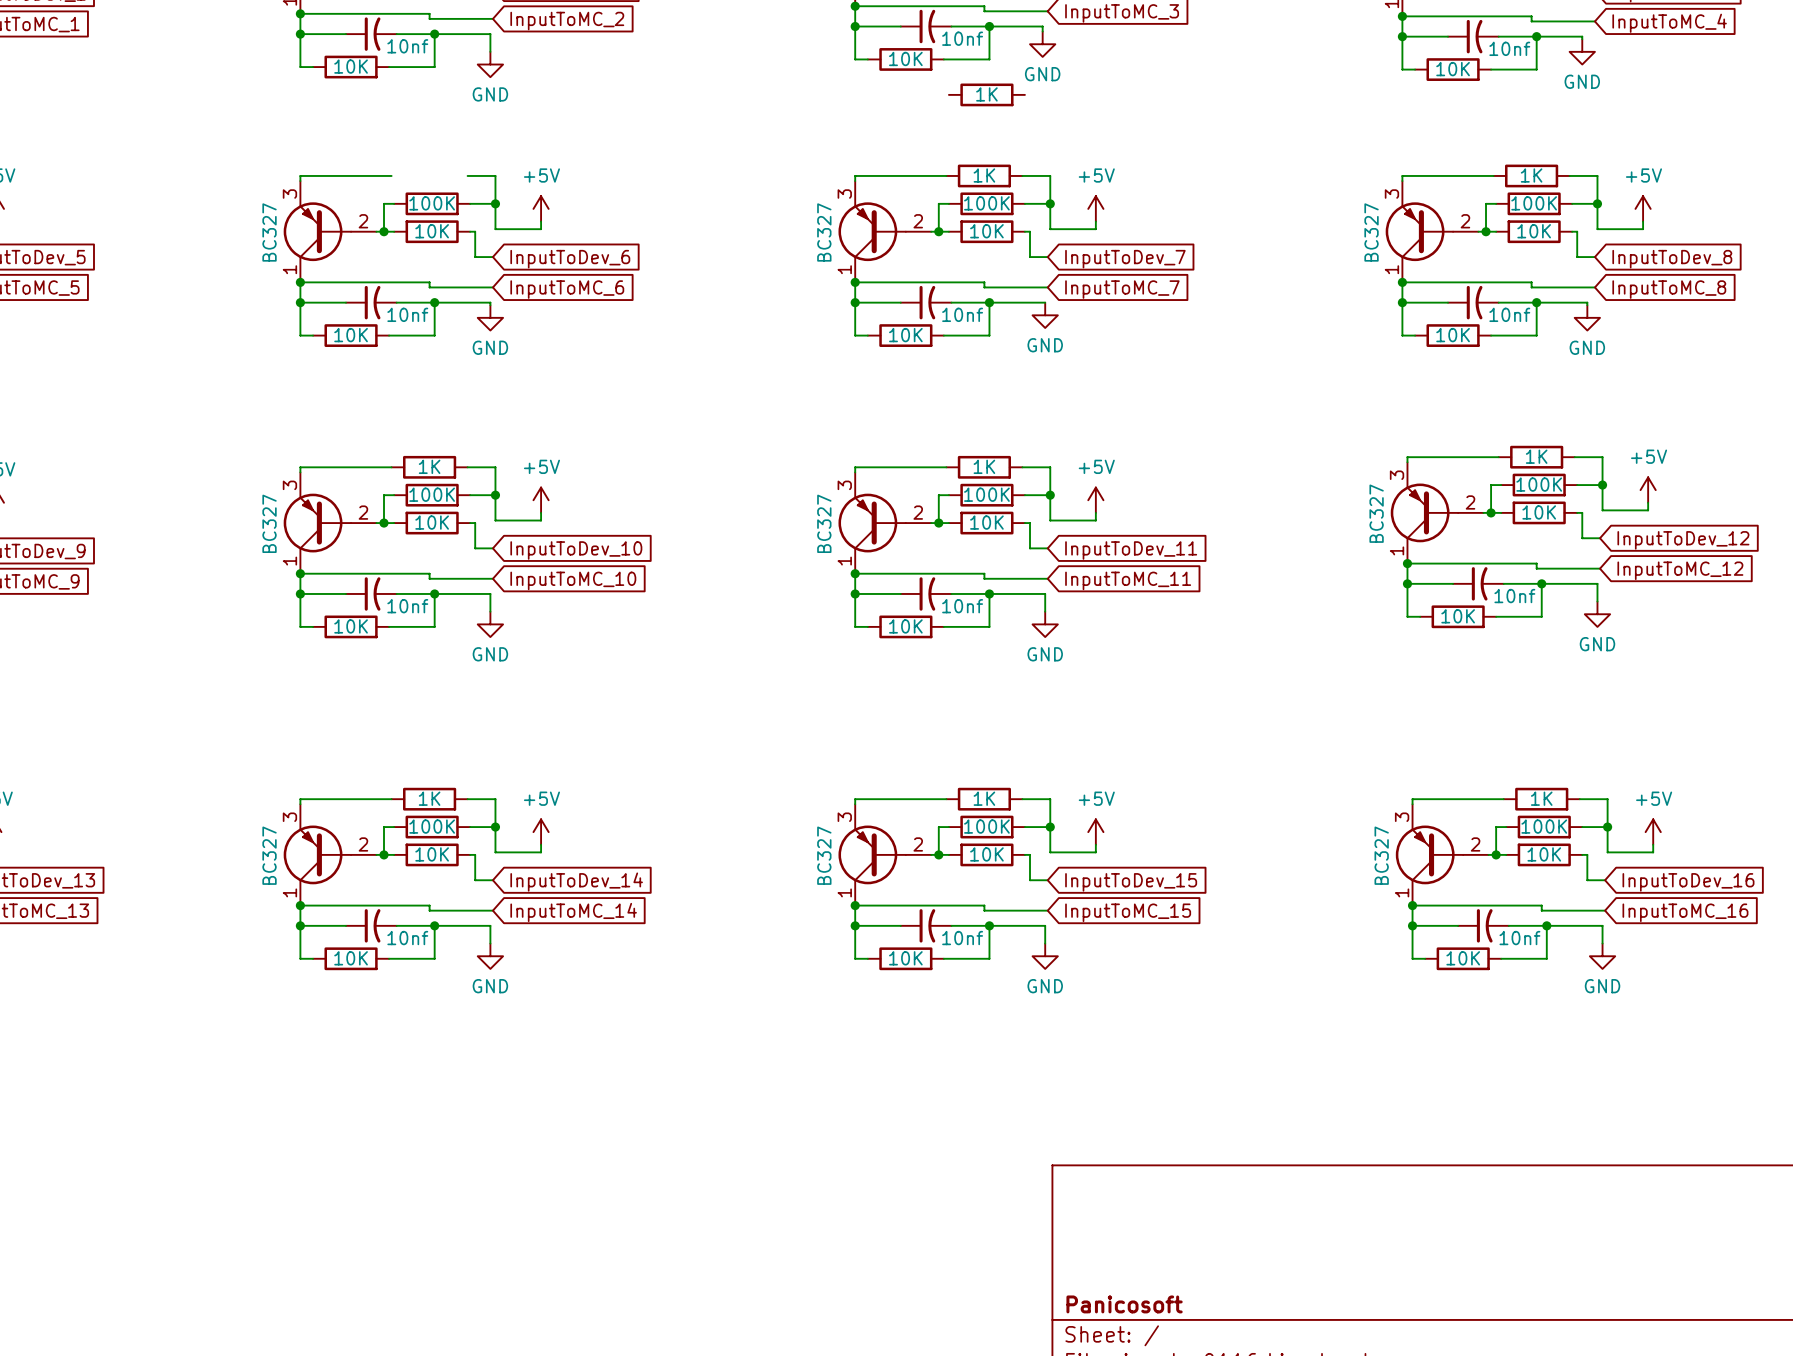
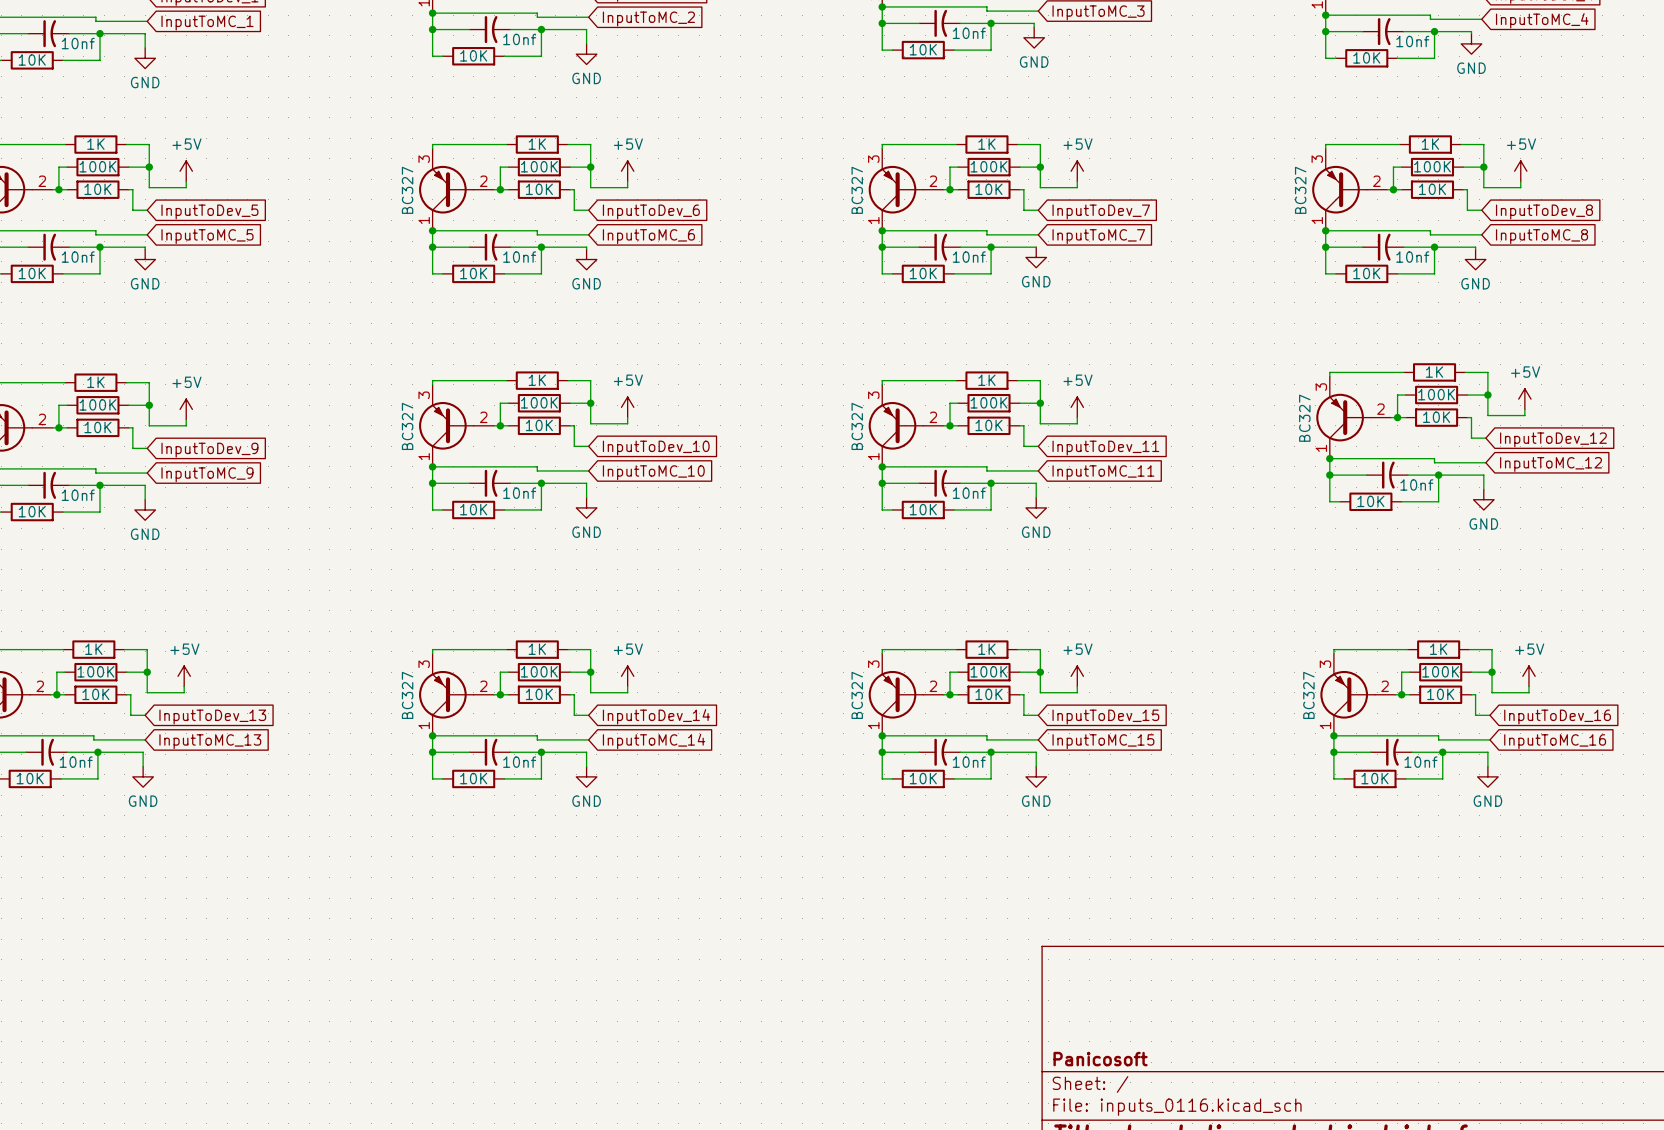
part: 1K (986, 94) -> none
part: none -> 1K (537, 144)

